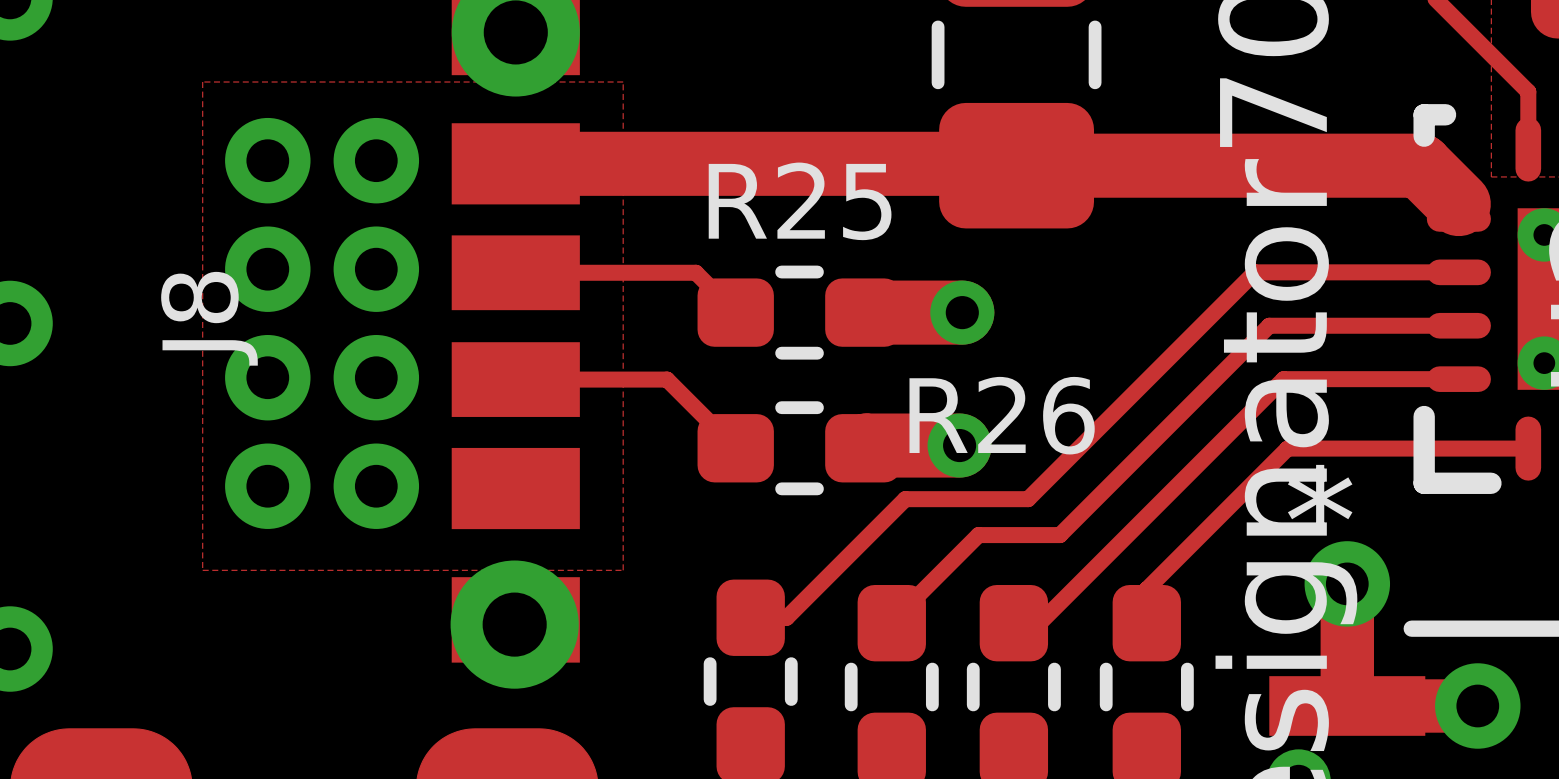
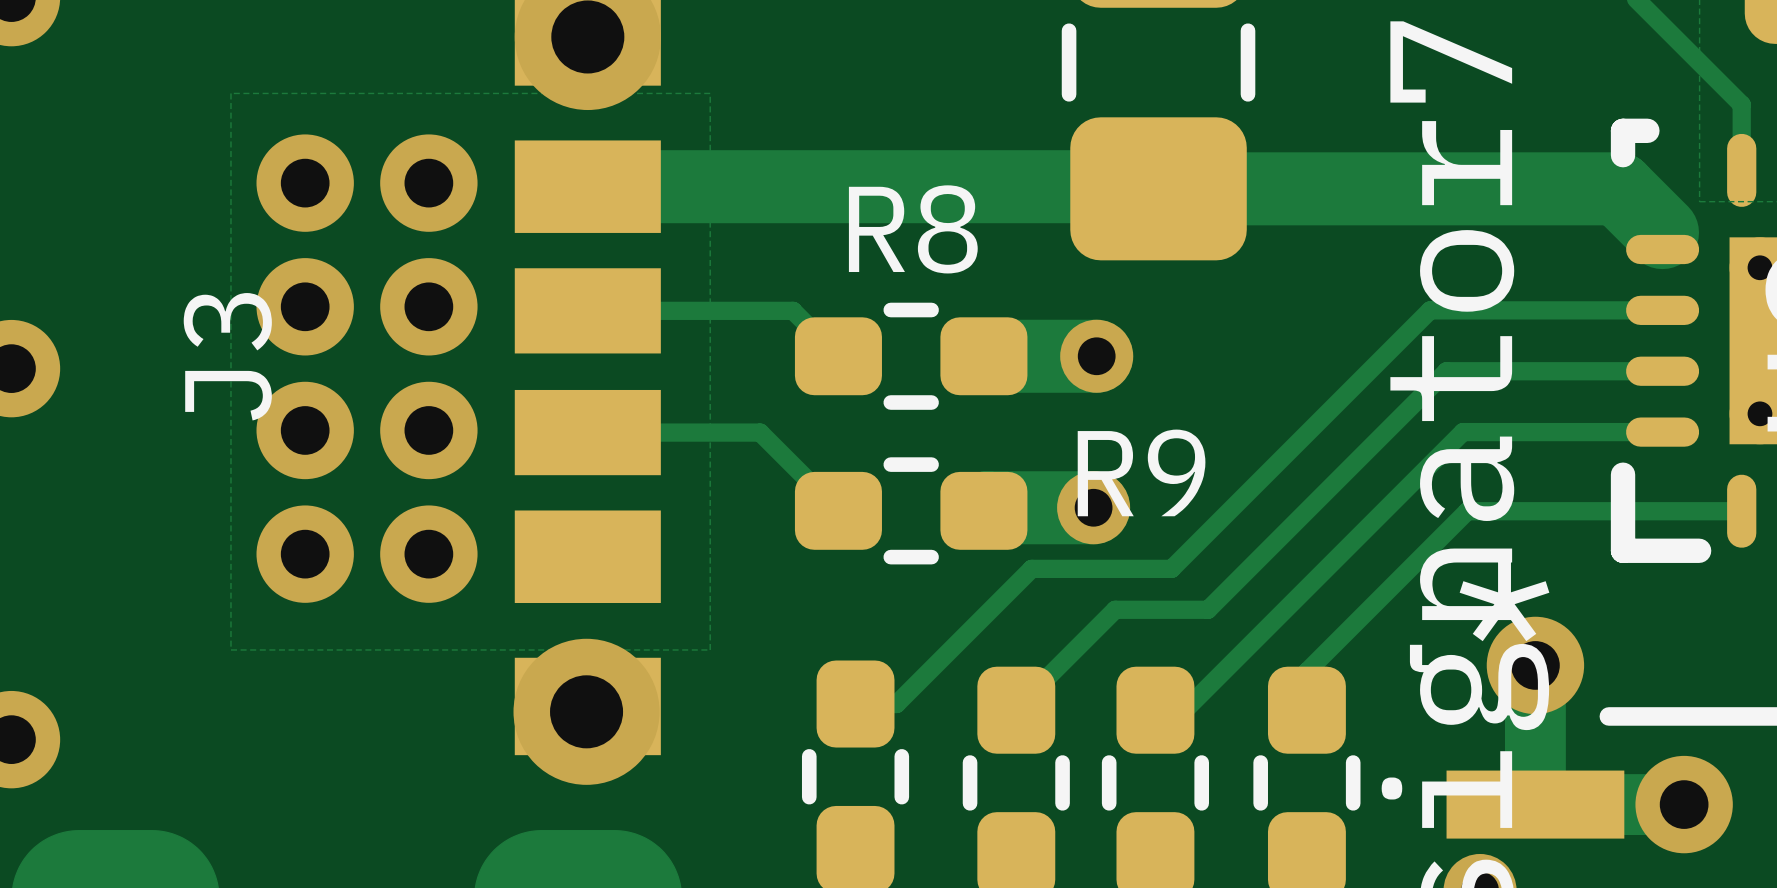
R25 name: R25 (800, 201) -> R8 (913, 229)
J8 name: J8 (209, 318) -> J3 (227, 356)
R26 name: R26 (1002, 415) -> R9 (1141, 472)

